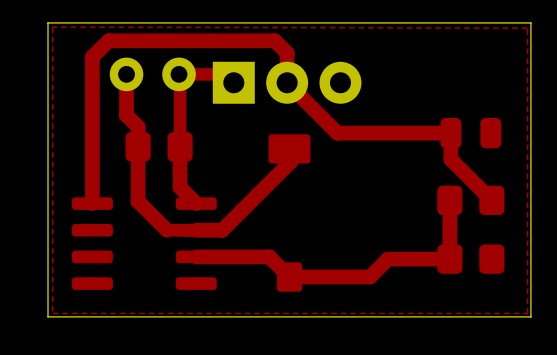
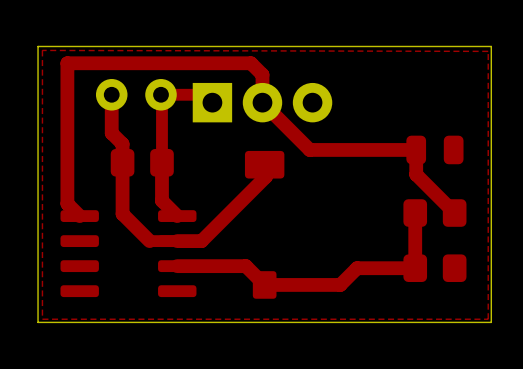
top track: (108, 40) (92, 57) (92, 203) -> (94, 63) (67, 63) (67, 203) (79, 216)

